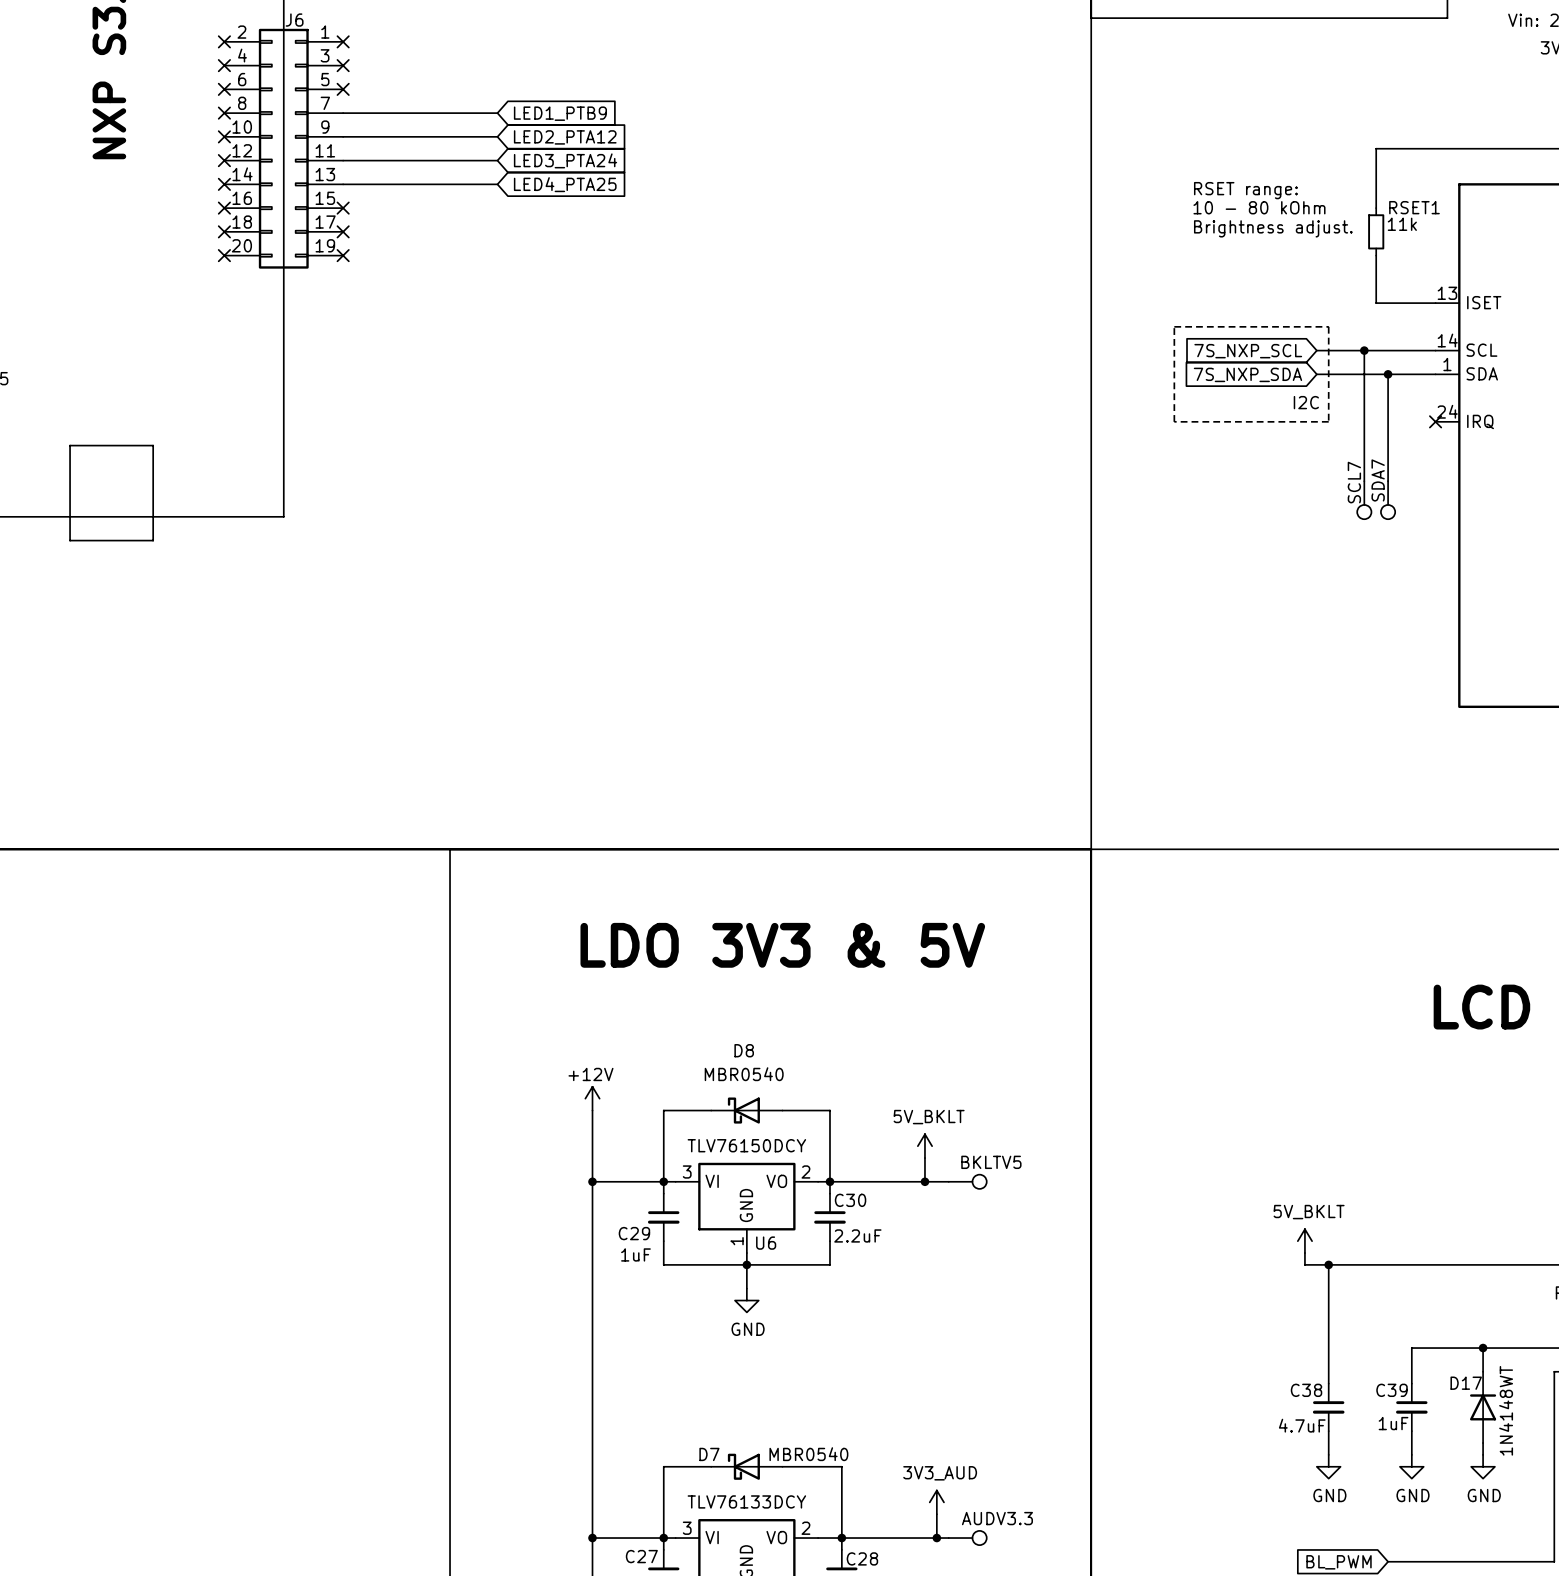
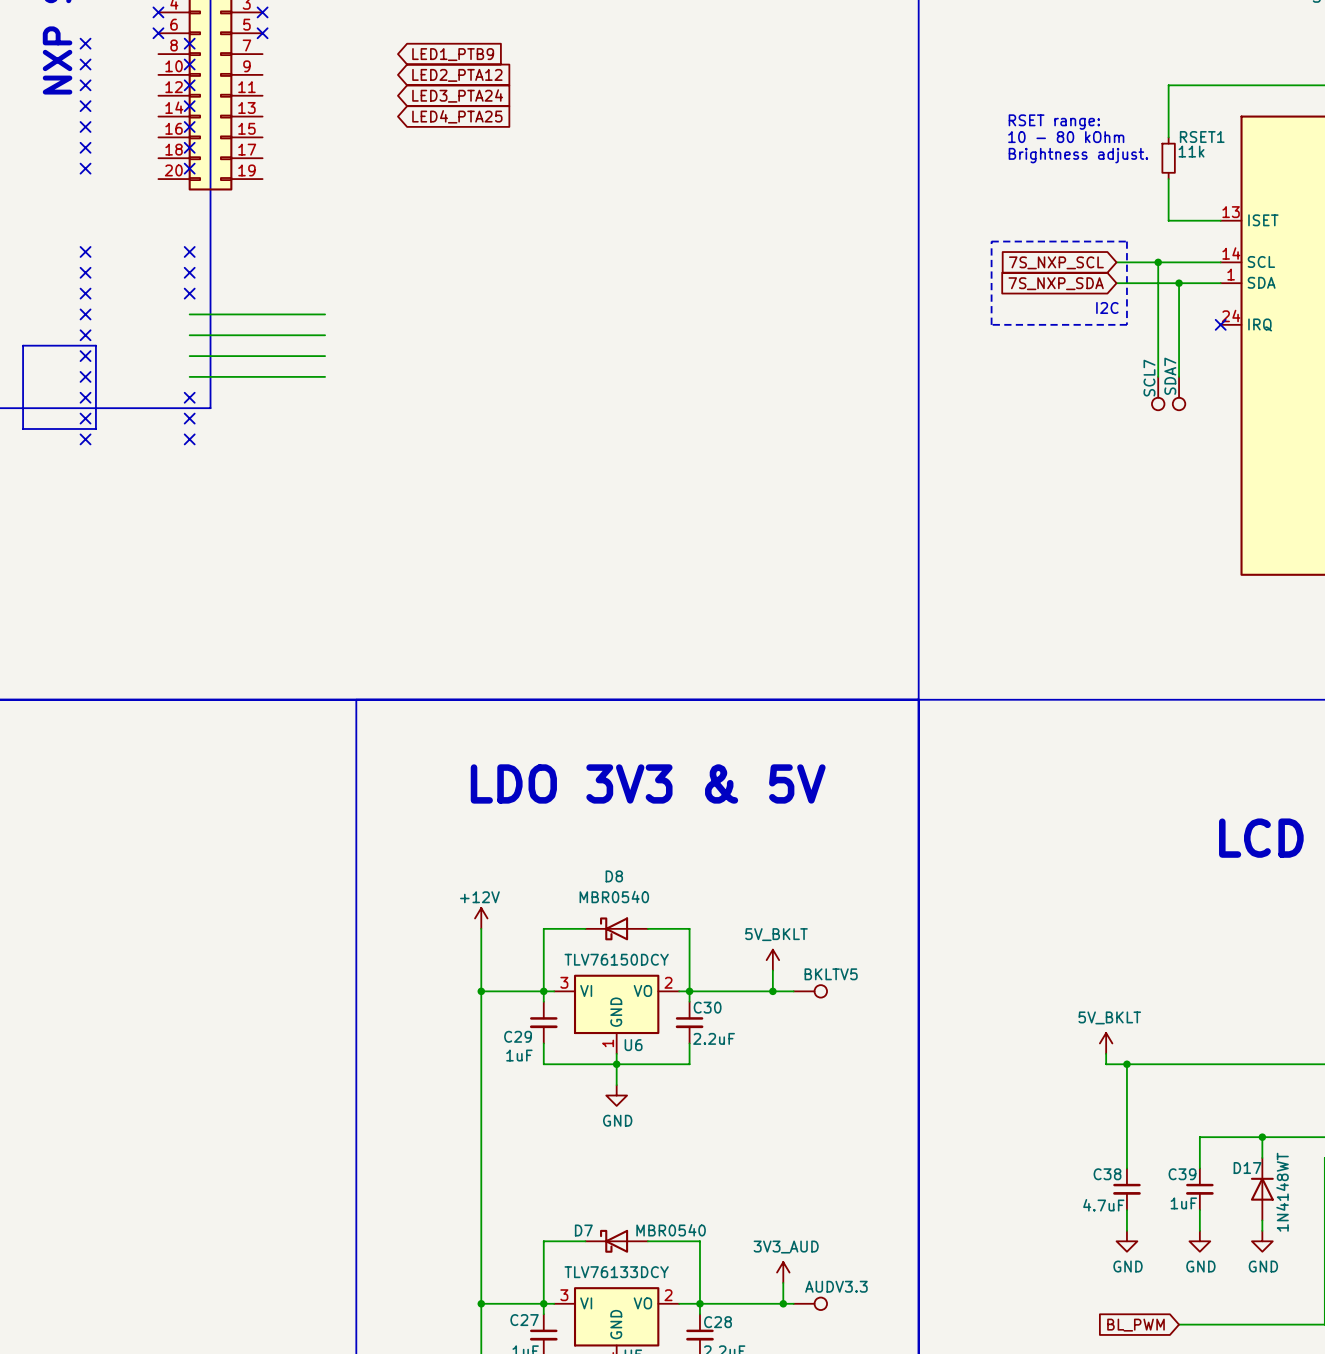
no-connect mark: none -> (85, 43)
no-connect mark: none -> (189, 43)
no-connect mark: (224, 113) -> none
wire: (343, 113) (497, 113) -> none
no-connect mark: none -> (85, 64)
no-connect mark: none -> (189, 64)
no-connect mark: (224, 136) -> none
wire: (343, 136) (497, 136) -> none
no-connect mark: none -> (85, 85)
no-connect mark: none -> (189, 85)
no-connect mark: (224, 160) -> none
wire: (343, 160) (497, 160) -> none
no-connect mark: none -> (85, 106)
no-connect mark: none -> (189, 106)
no-connect mark: (224, 184) -> none
wire: (343, 184) (497, 184) -> none
no-connect mark: none -> (85, 126)
no-connect mark: none -> (189, 126)
no-connect mark: (224, 208) -> none
no-connect mark: (343, 208) -> none
no-connect mark: none -> (85, 147)
no-connect mark: none -> (189, 147)
no-connect mark: (224, 231) -> none
no-connect mark: (343, 231) -> none
no-connect mark: none -> (85, 168)
no-connect mark: none -> (189, 168)
no-connect mark: (224, 255) -> none
no-connect mark: (343, 255) -> none
no-connect mark: none -> (85, 251)
no-connect mark: none -> (189, 251)
no-connect mark: none -> (85, 272)
no-connect mark: none -> (189, 272)
no-connect mark: none -> (85, 293)
no-connect mark: none -> (189, 293)
no-connect mark: none -> (85, 314)
wire: none -> (189, 314) (325, 314)
no-connect mark: none -> (85, 335)
wire: none -> (189, 335) (325, 335)
no-connect mark: none -> (85, 356)
wire: none -> (189, 356) (325, 356)
no-connect mark: none -> (85, 376)
wire: none -> (189, 376) (325, 376)
no-connect mark: none -> (85, 397)
no-connect mark: none -> (189, 397)
no-connect mark: none -> (85, 418)
no-connect mark: none -> (189, 418)
no-connect mark: none -> (85, 439)
no-connect mark: none -> (189, 439)

